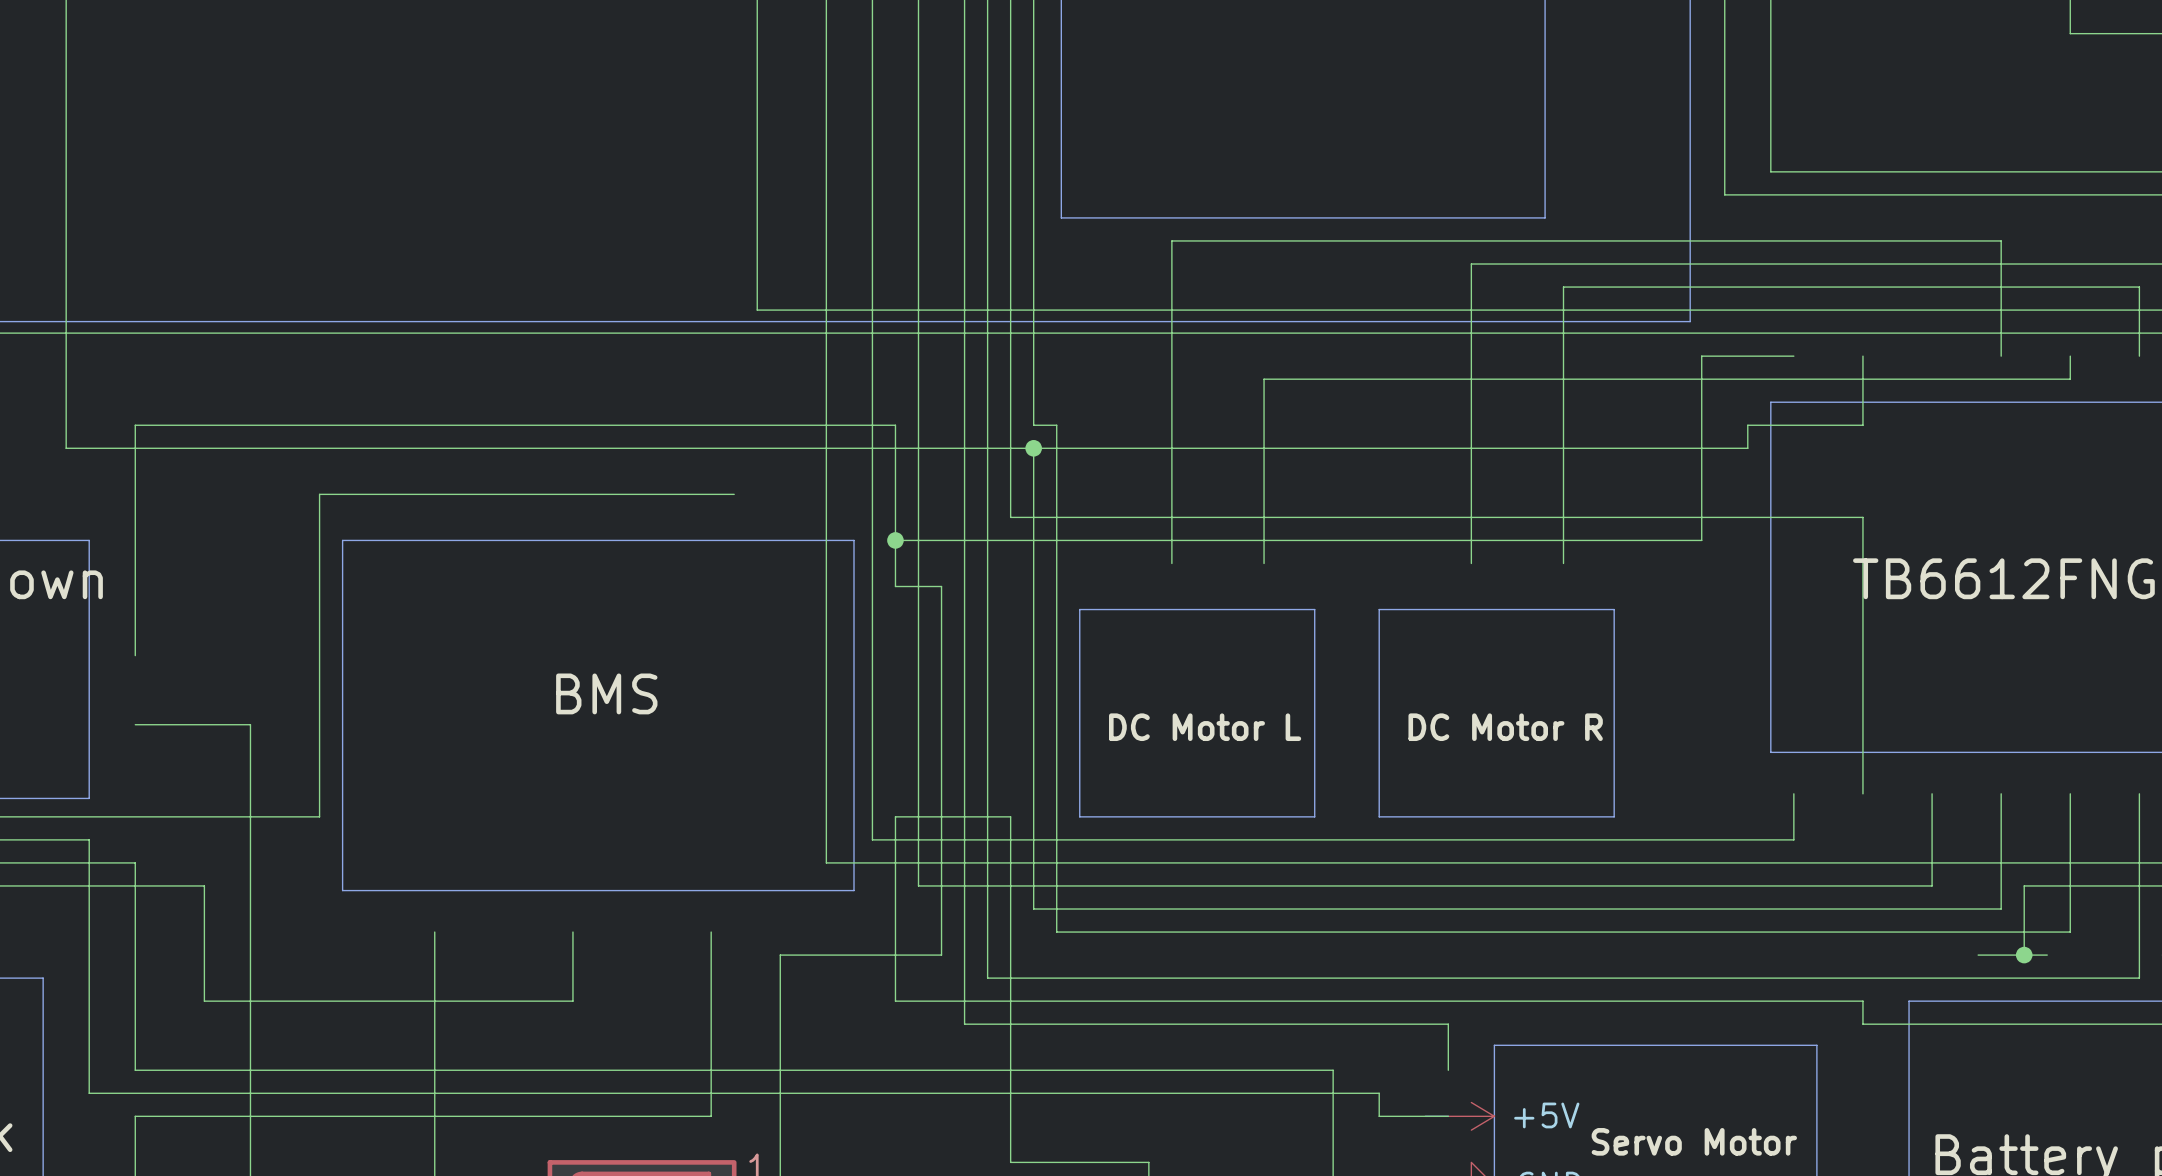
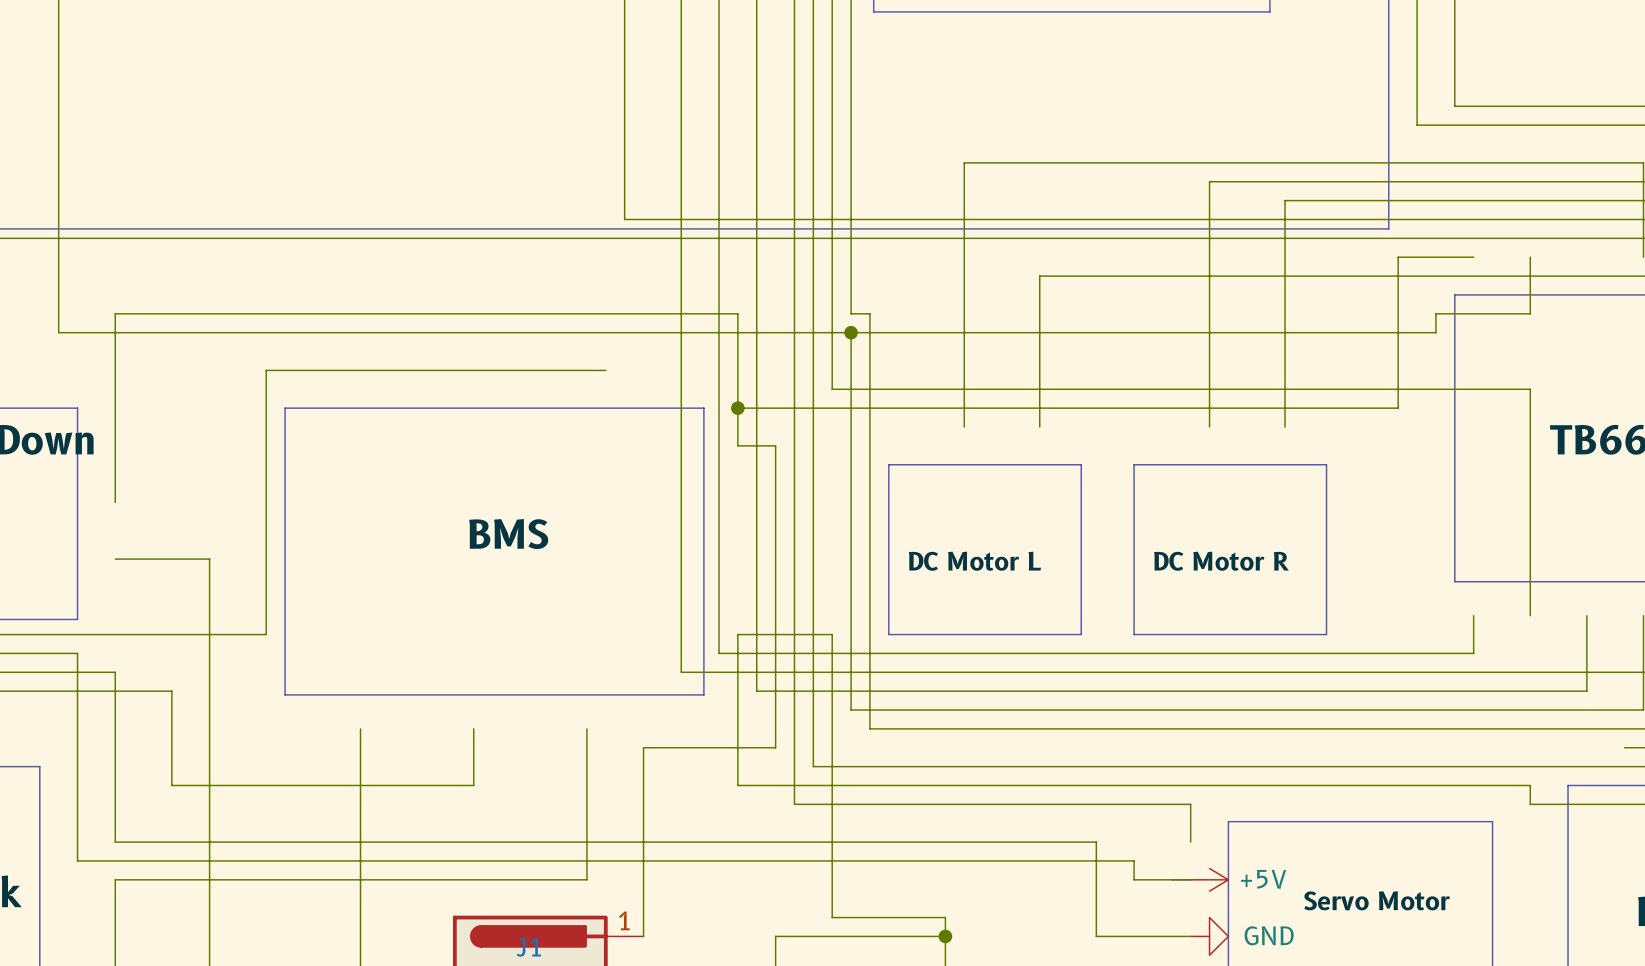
line: (1061, 56) (1061, 217) (1545, 217) (1545, 56) -> (873, 11) (1269, 11)

